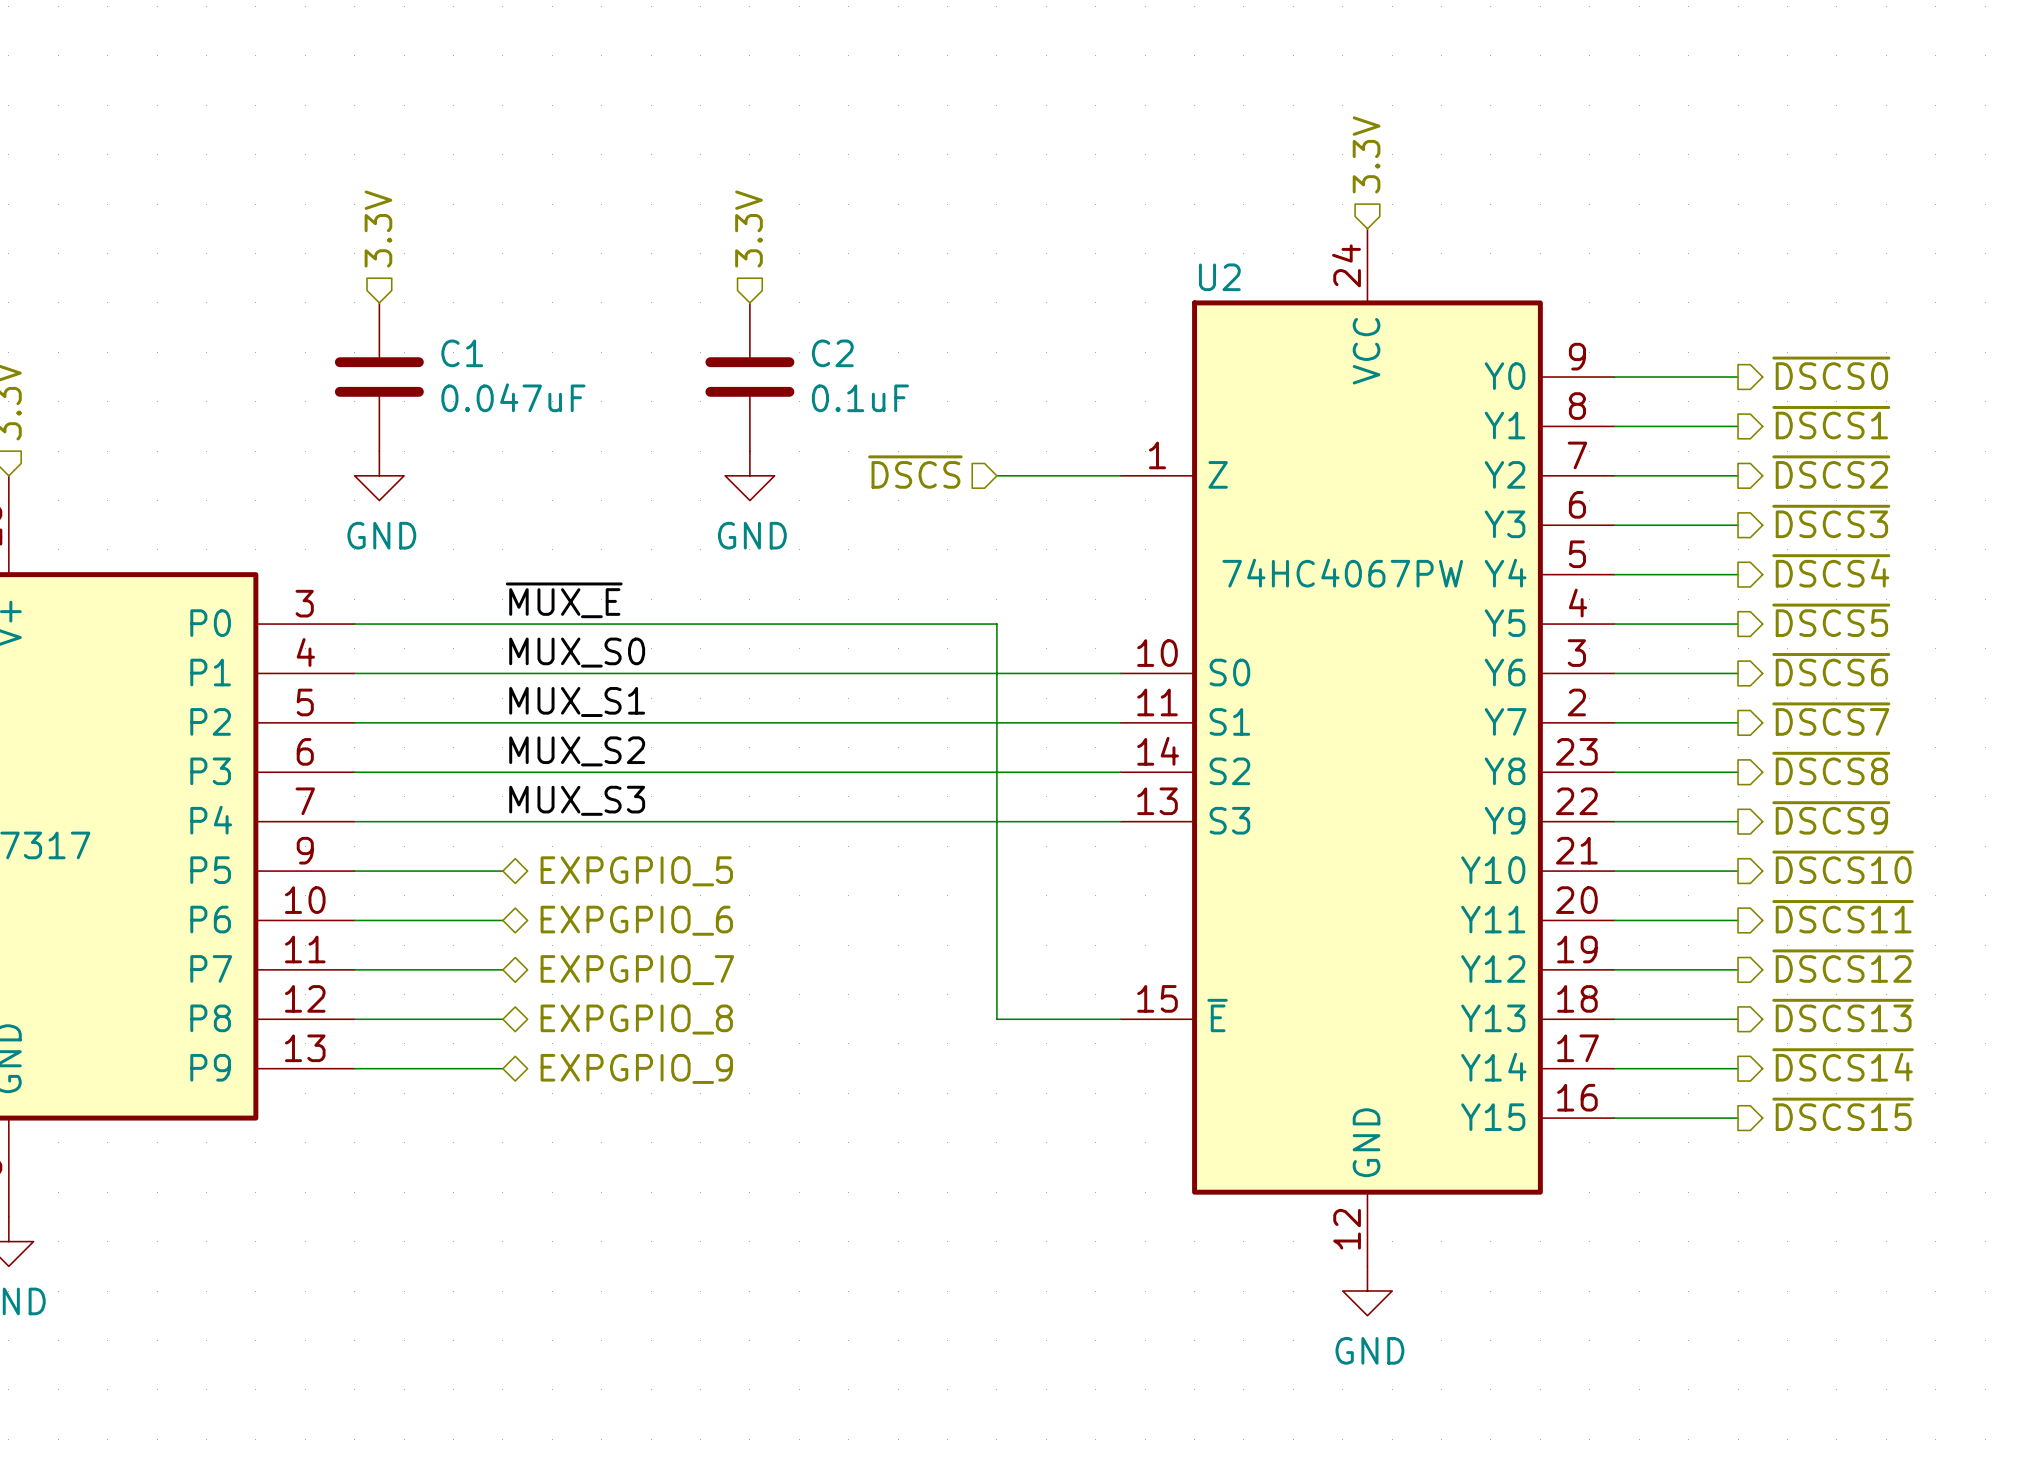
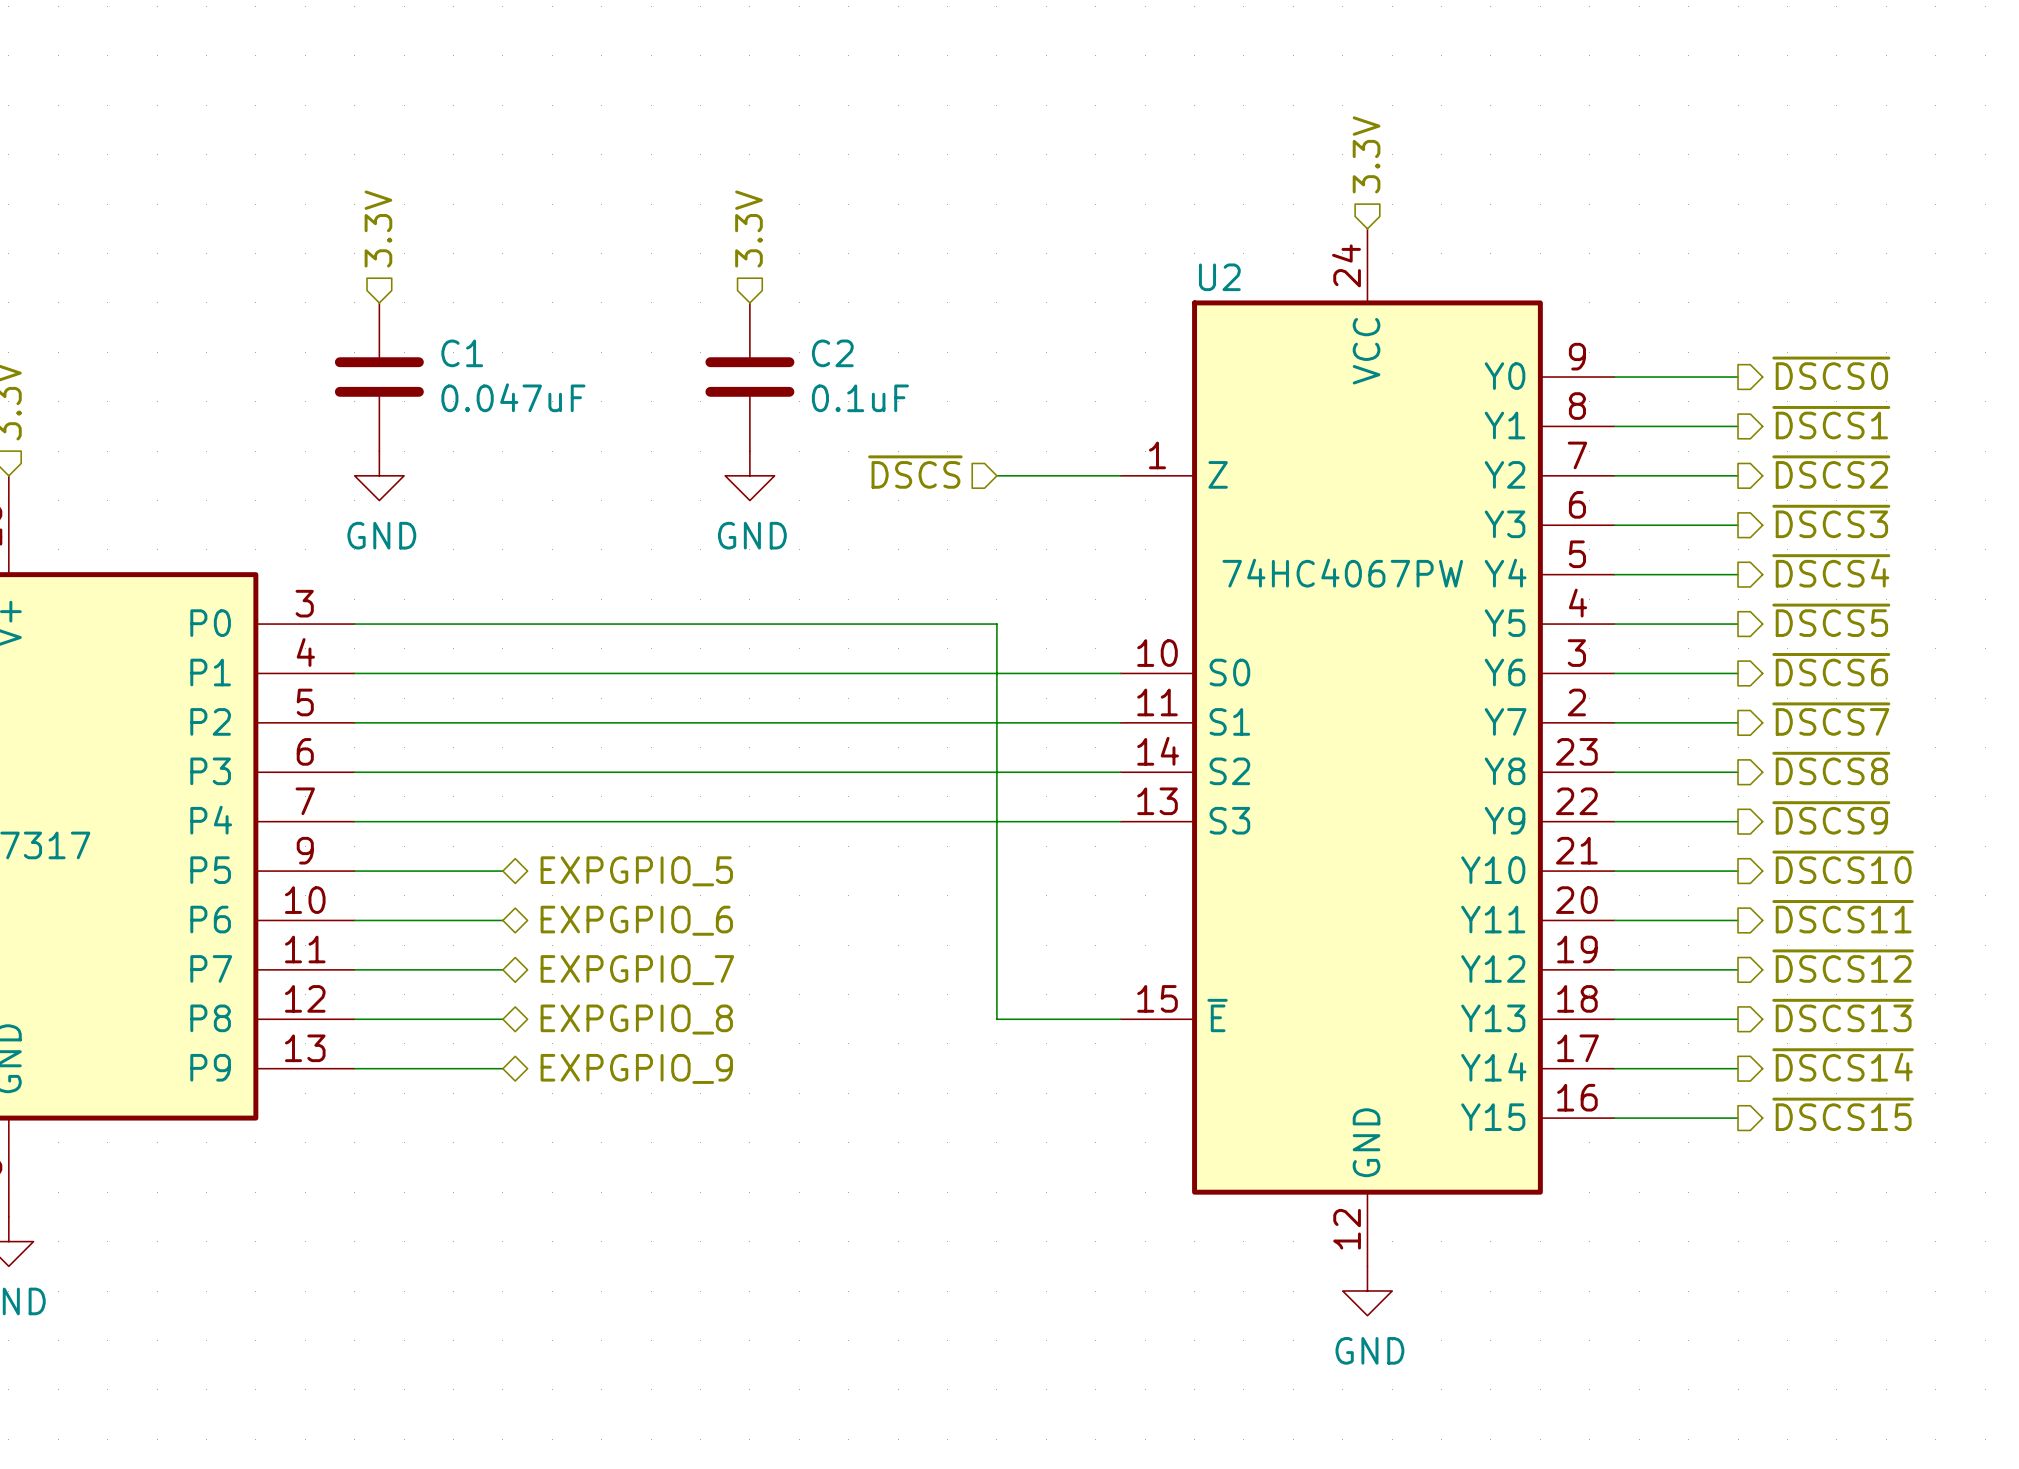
label: ~{MUX_E} (564, 600) -> none
label: MUX_S0 (577, 652) -> none
label: MUX_S1 (577, 701) -> none
label: MUX_S2 (577, 751) -> none
label: MUX_S3 (577, 800) -> none

